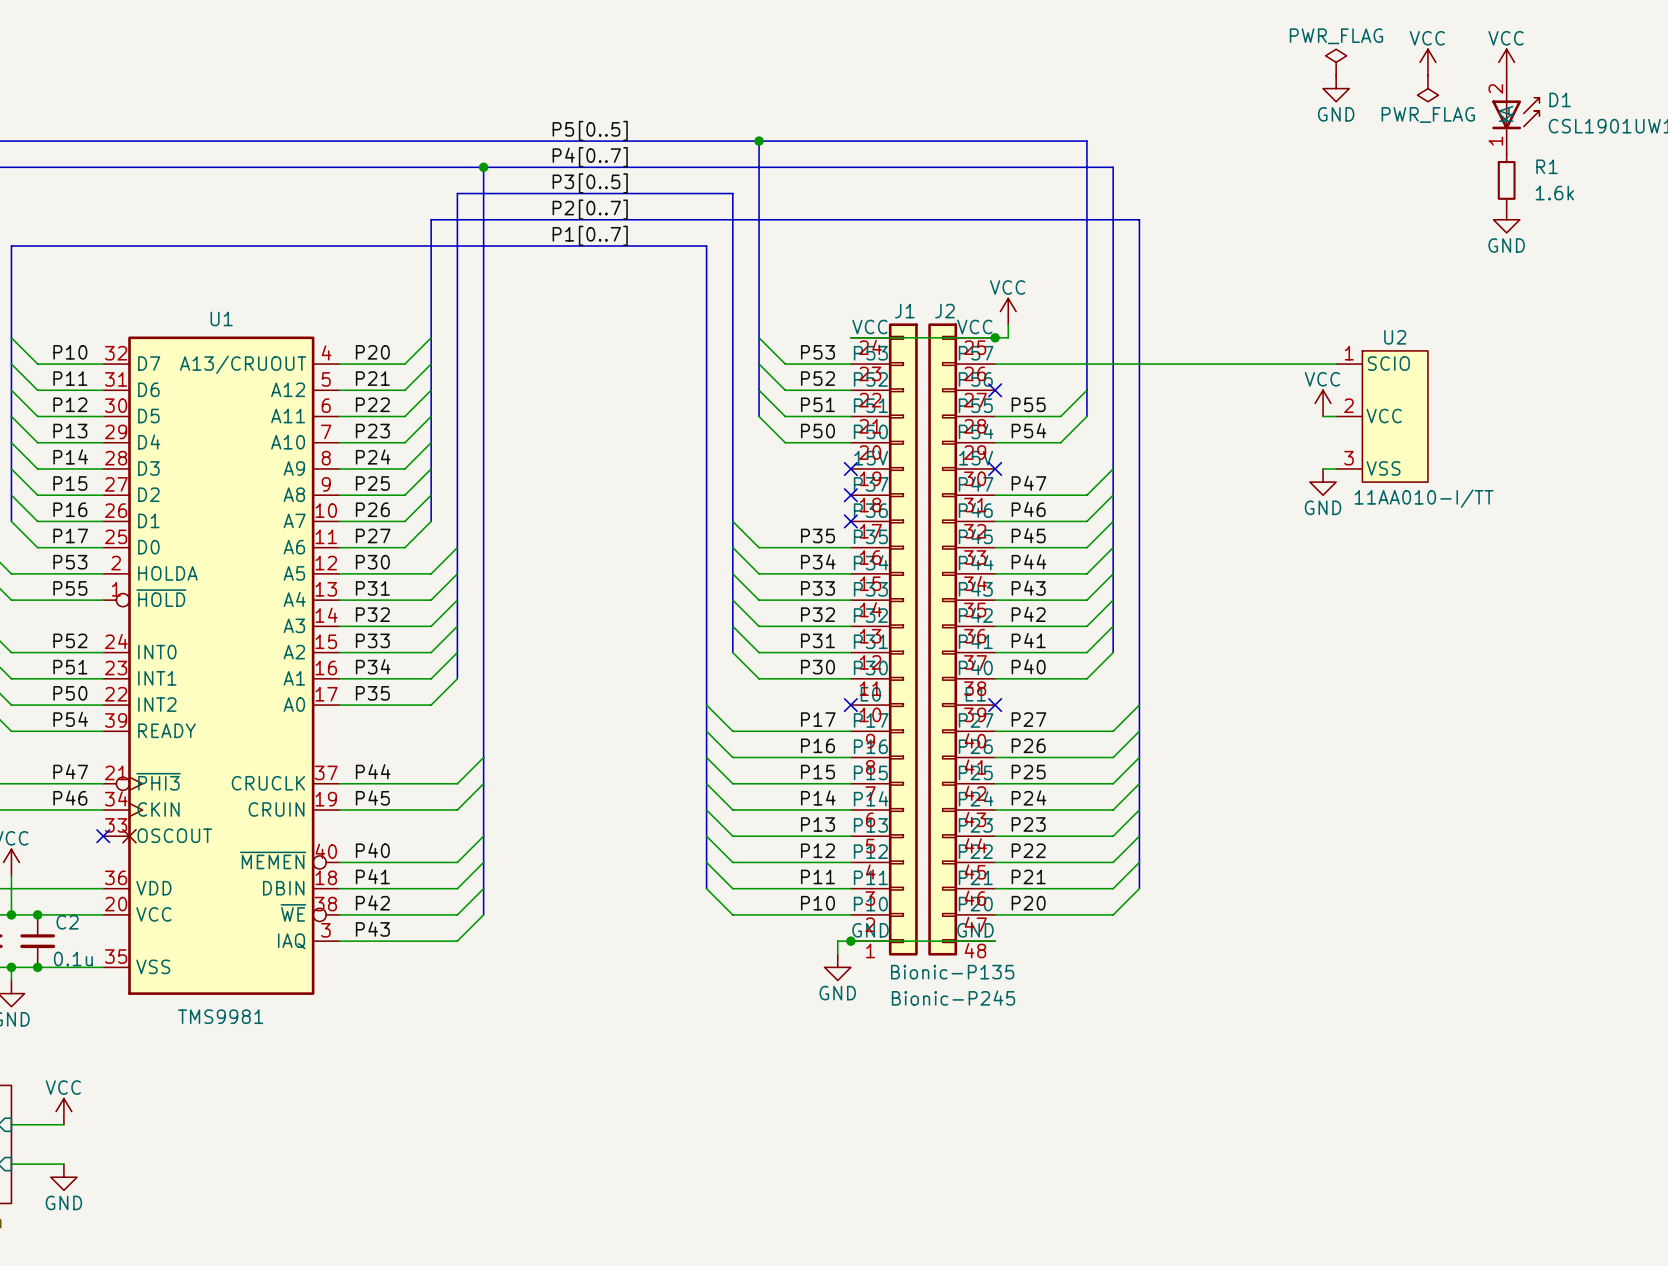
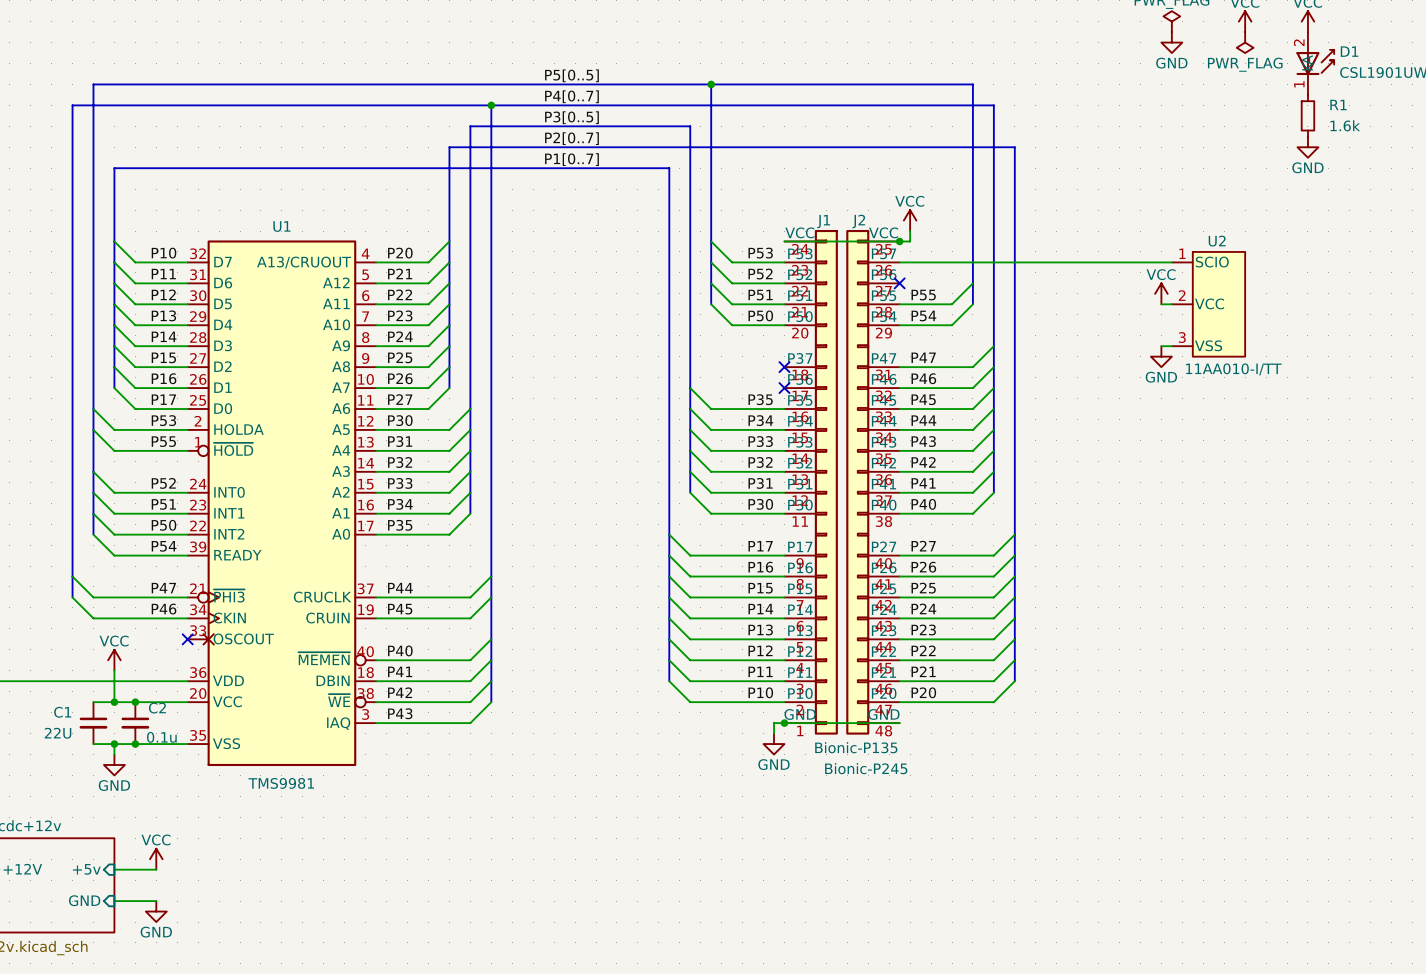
J1 symbol: [850, 323, 918, 956] -> [784, 229, 838, 735]
J2 symbol: [928, 323, 996, 956] -> [846, 229, 900, 735]
no-connect mark: (850, 468) -> none
no-connect mark: (995, 468) -> none
no-connect mark: (850, 705) -> none
no-connect mark: (995, 705) -> none

